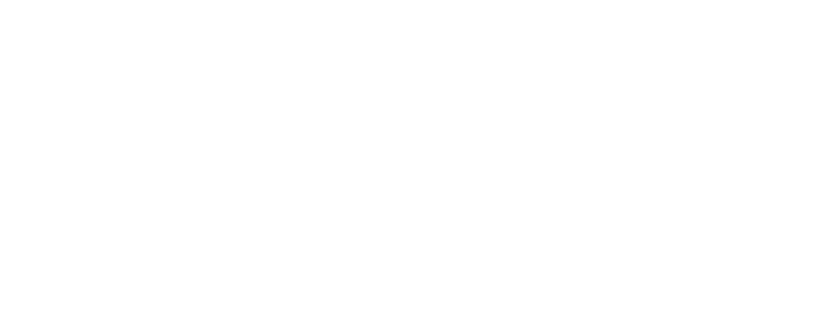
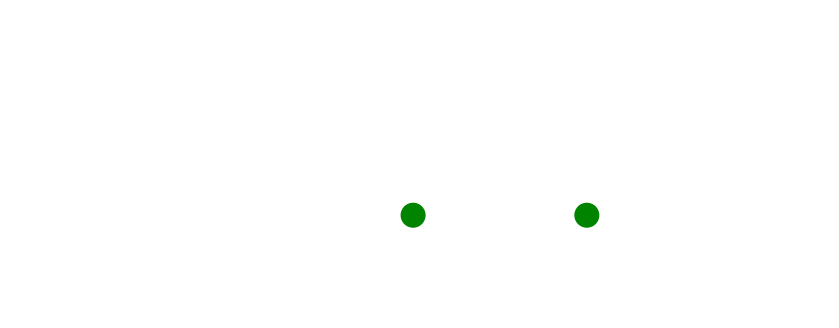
junction: none -> (413, 215)
junction: none -> (586, 215)

